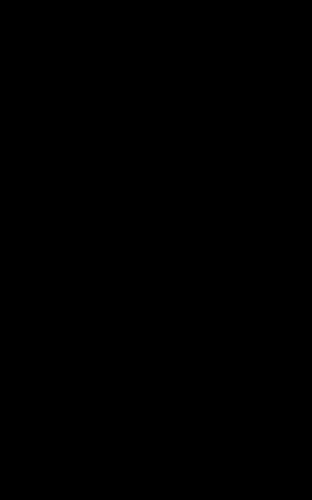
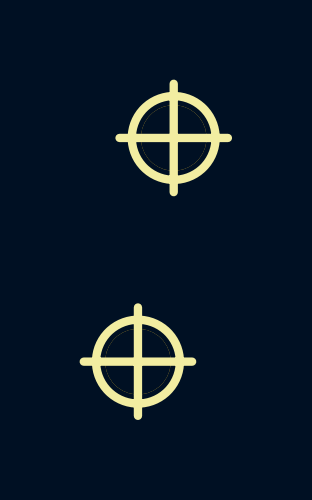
part: none -> (173, 137)
part: none -> (137, 361)

